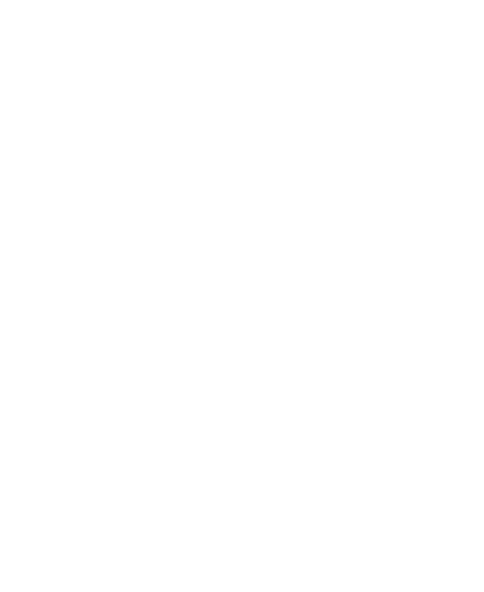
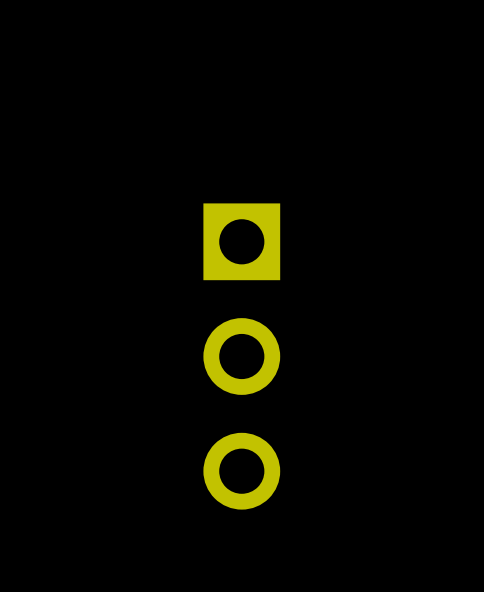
part: none -> (241, 356)

